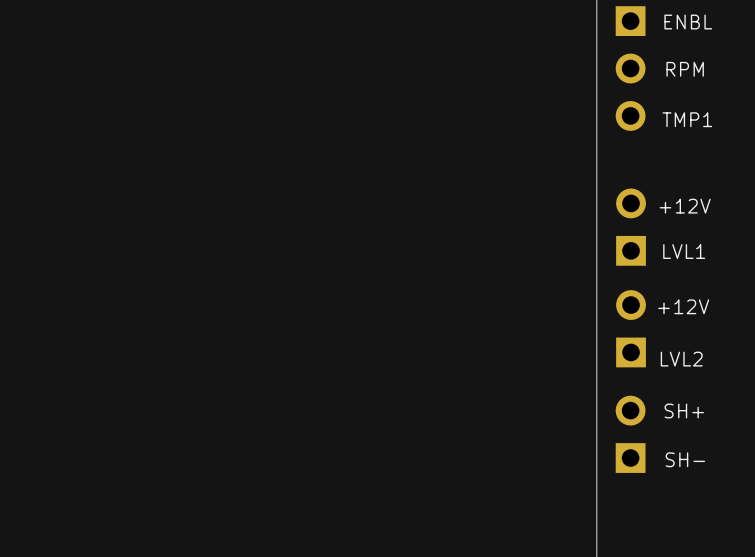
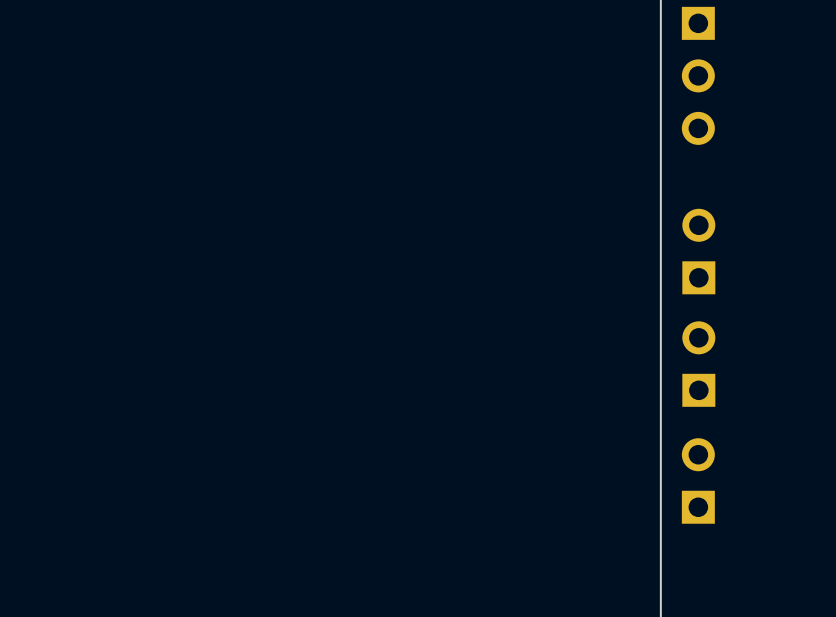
text: ENBL (688, 22) -> none
text: RPM (685, 69) -> none
text: TMP1 (687, 119) -> none
text: +12V (685, 206) -> none
text: LVL1 (684, 251) -> none
text: +12V (683, 306) -> none
text: LVL2 (681, 359) -> none
text: SH+ (684, 410) -> none
text: SH- (685, 459) -> none

